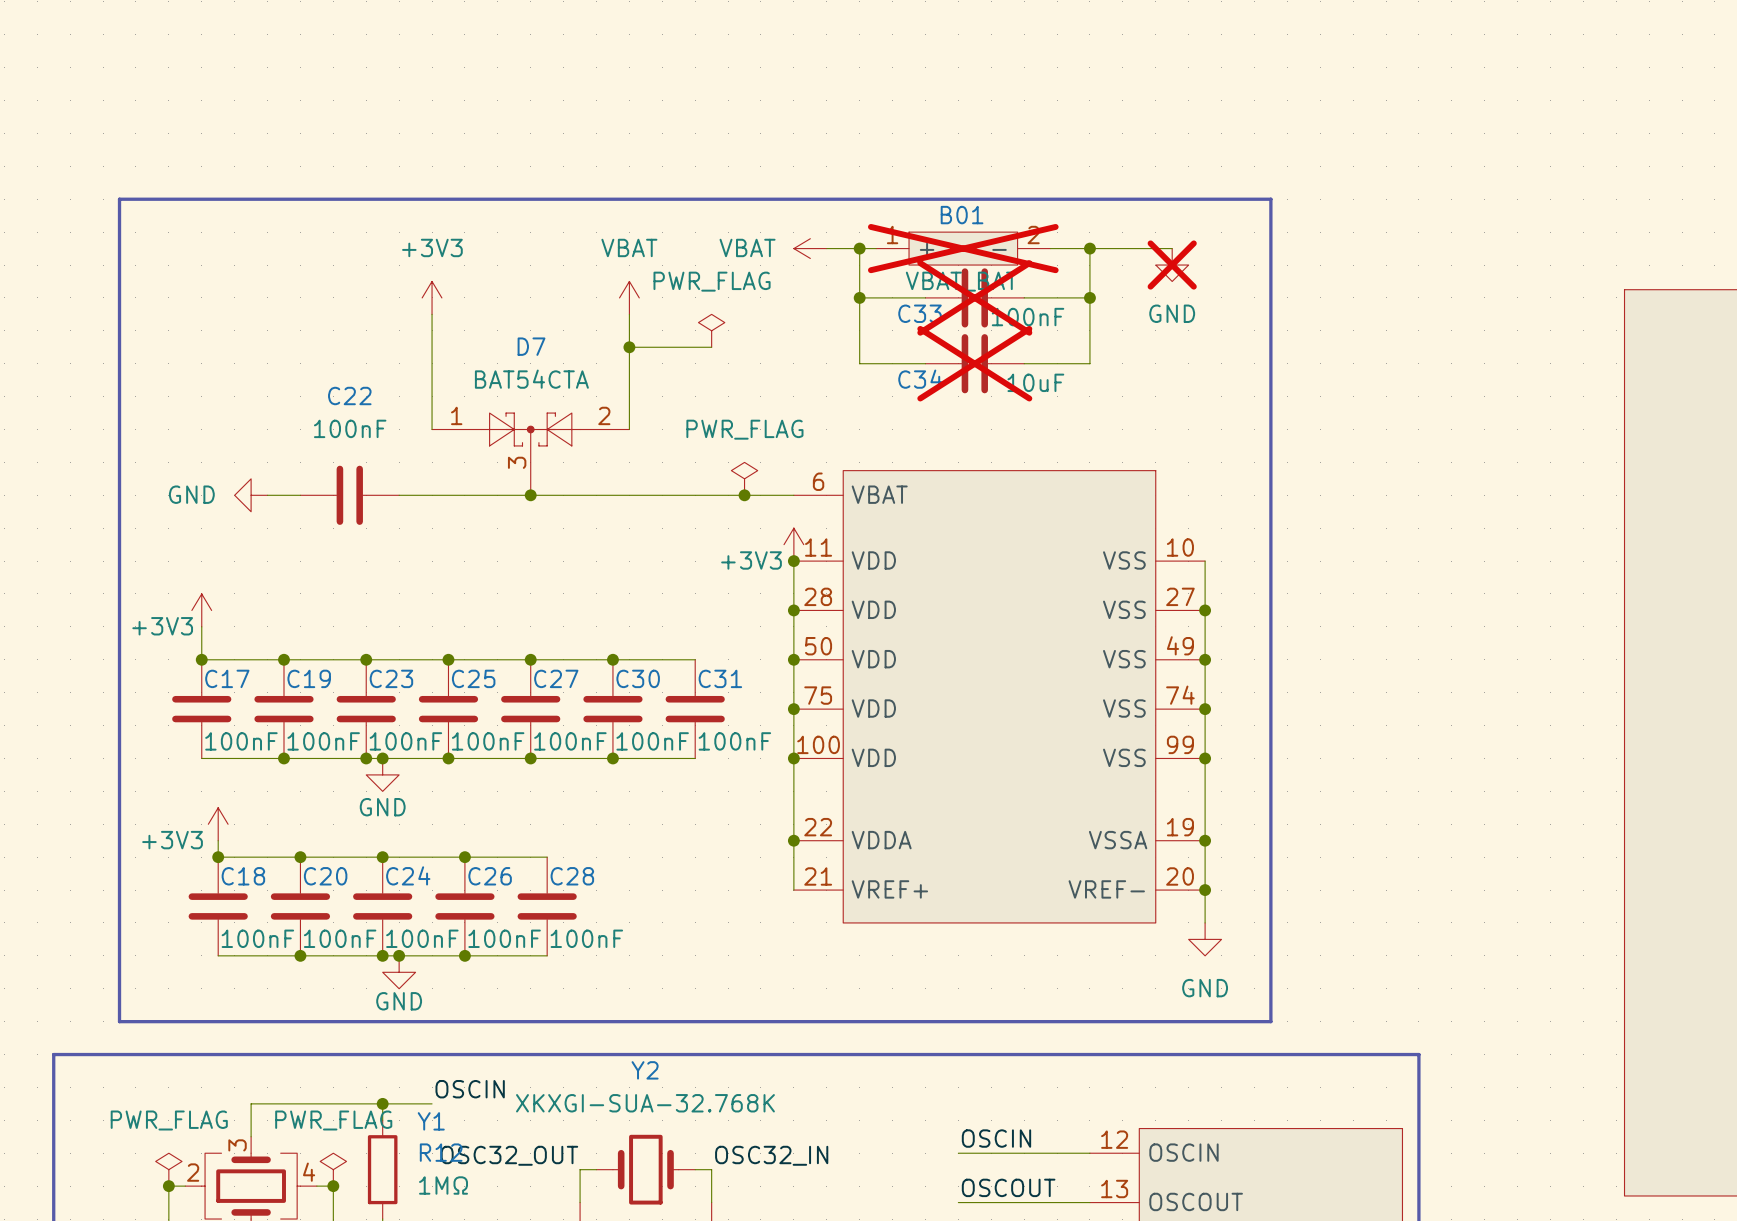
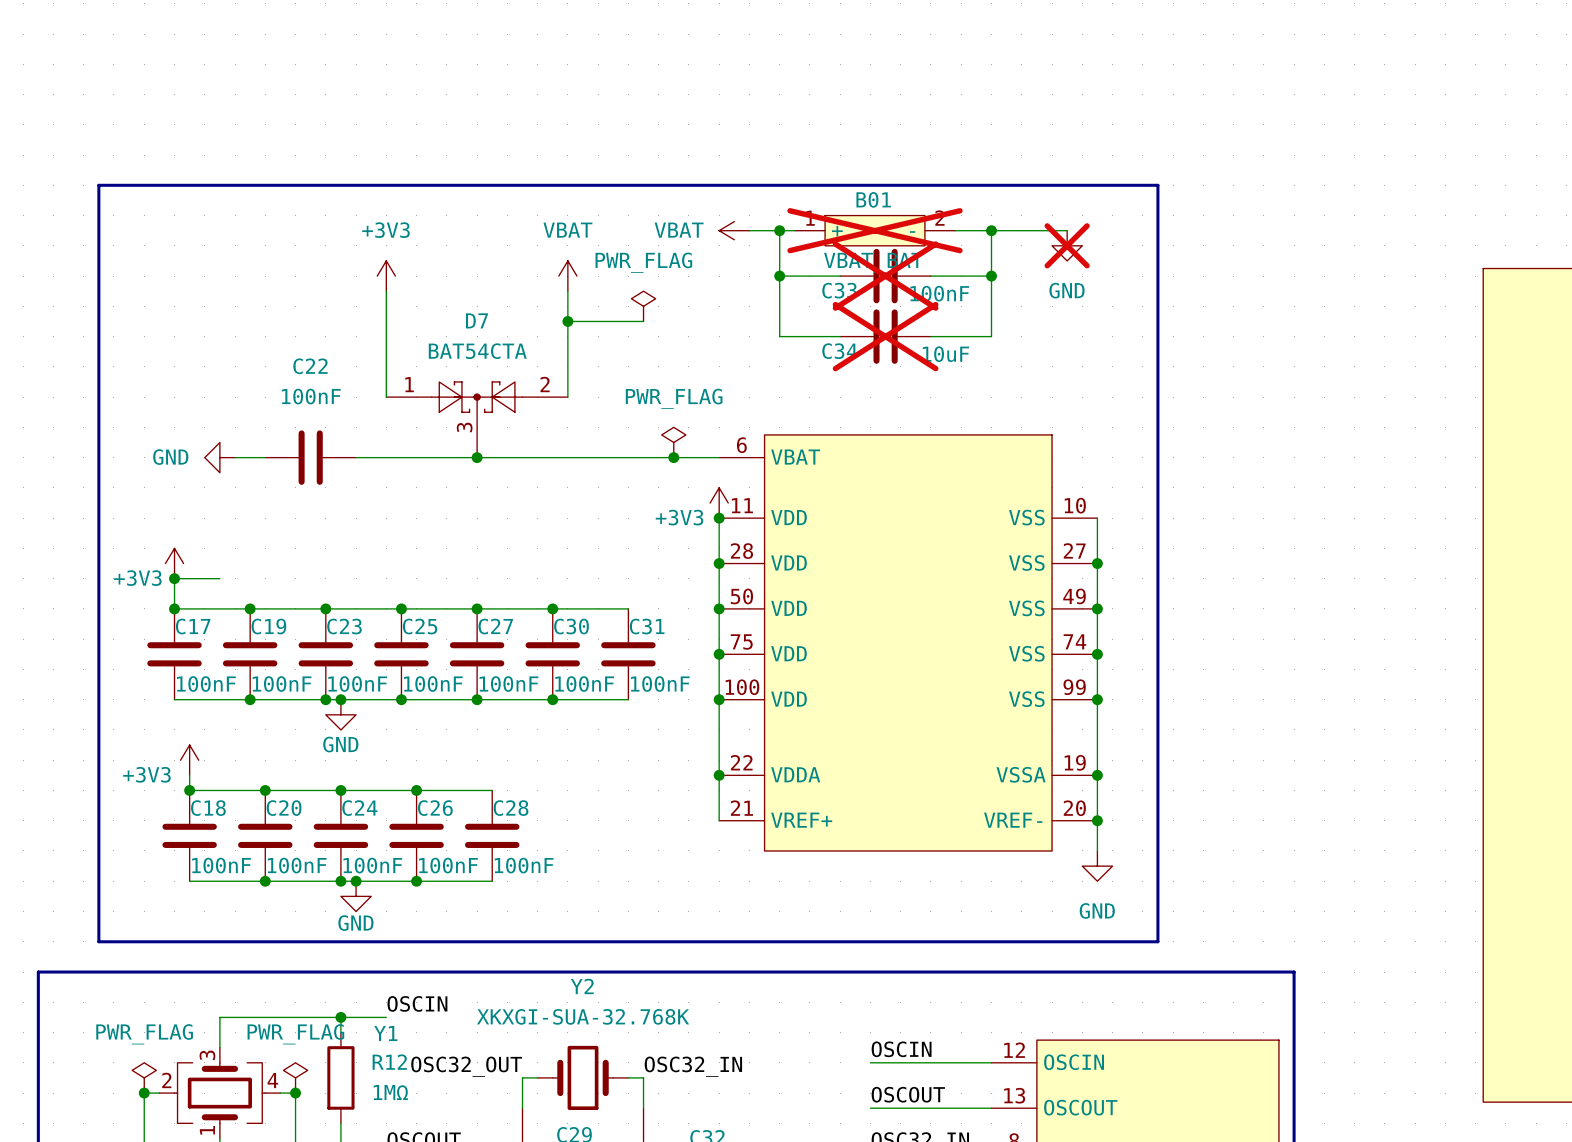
wire: none -> (174, 578) (219, 578)
junction: none -> (174, 578)

